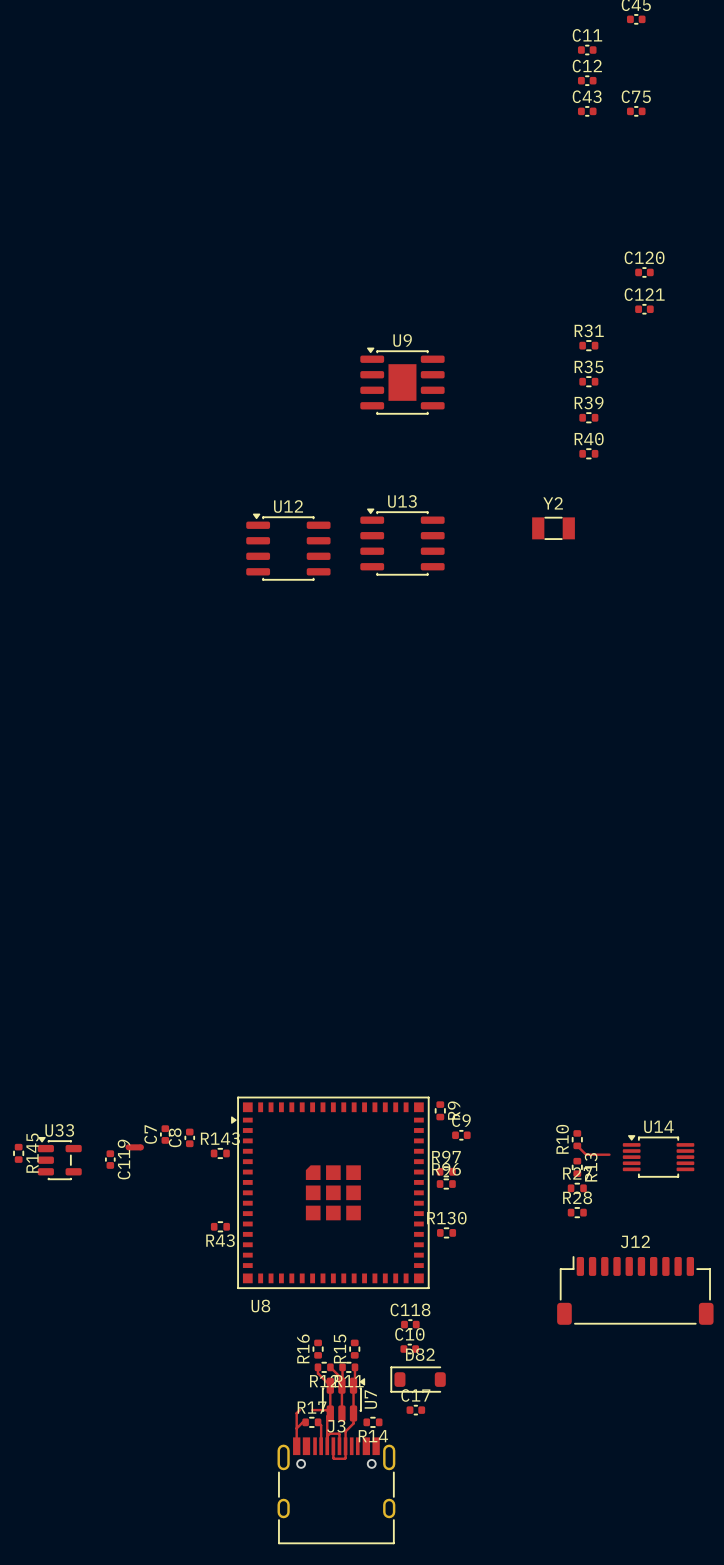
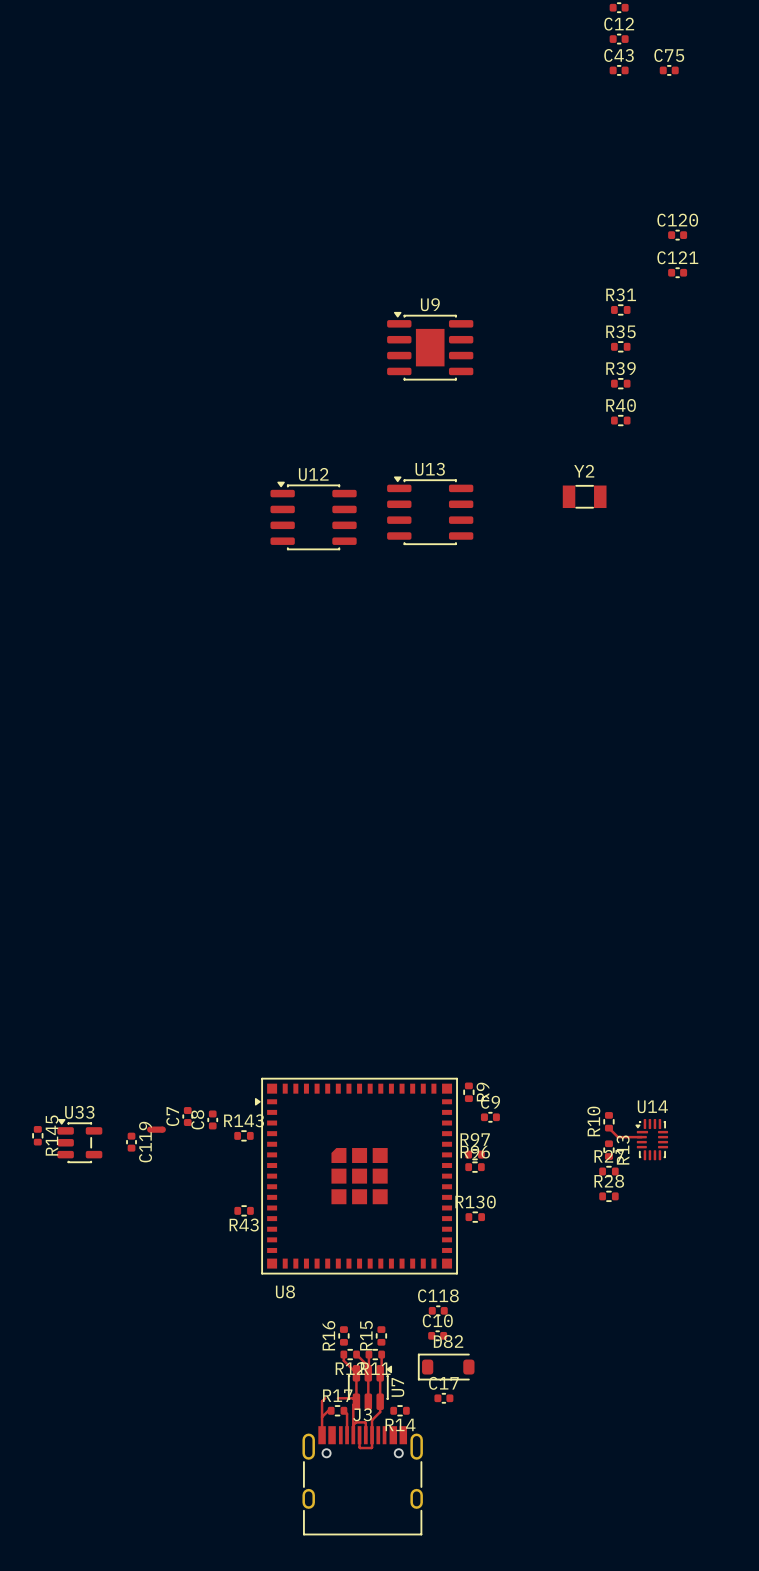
U14 footprint: [622, 1135, 695, 1178] -> [635, 1119, 669, 1161]
J12: (635, 1290) -> none

